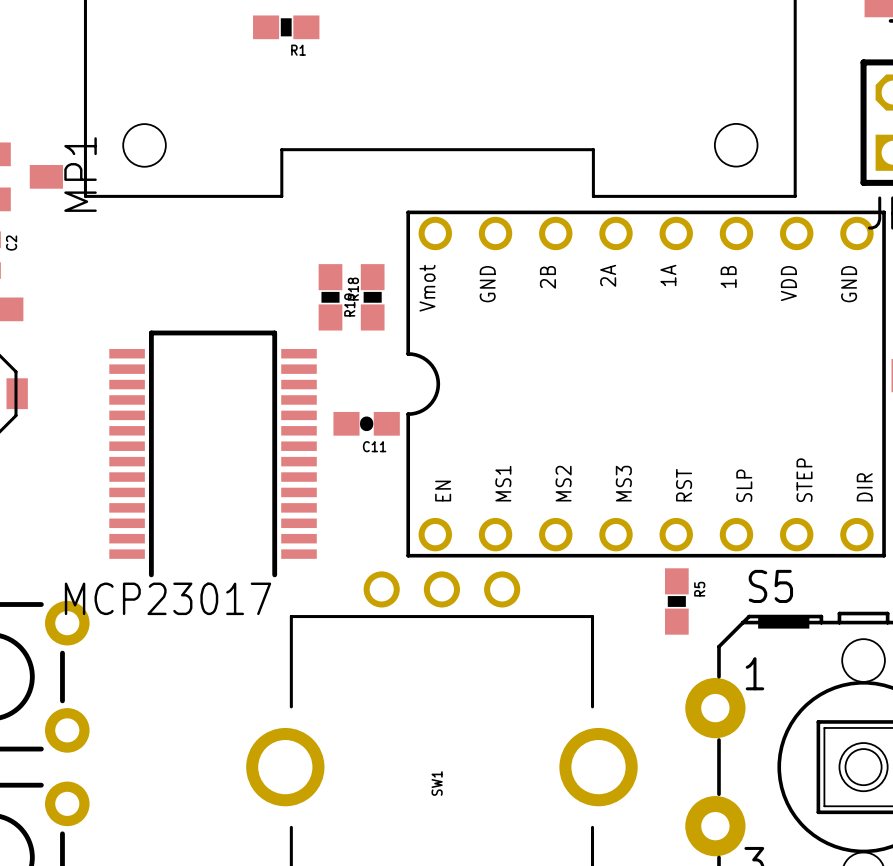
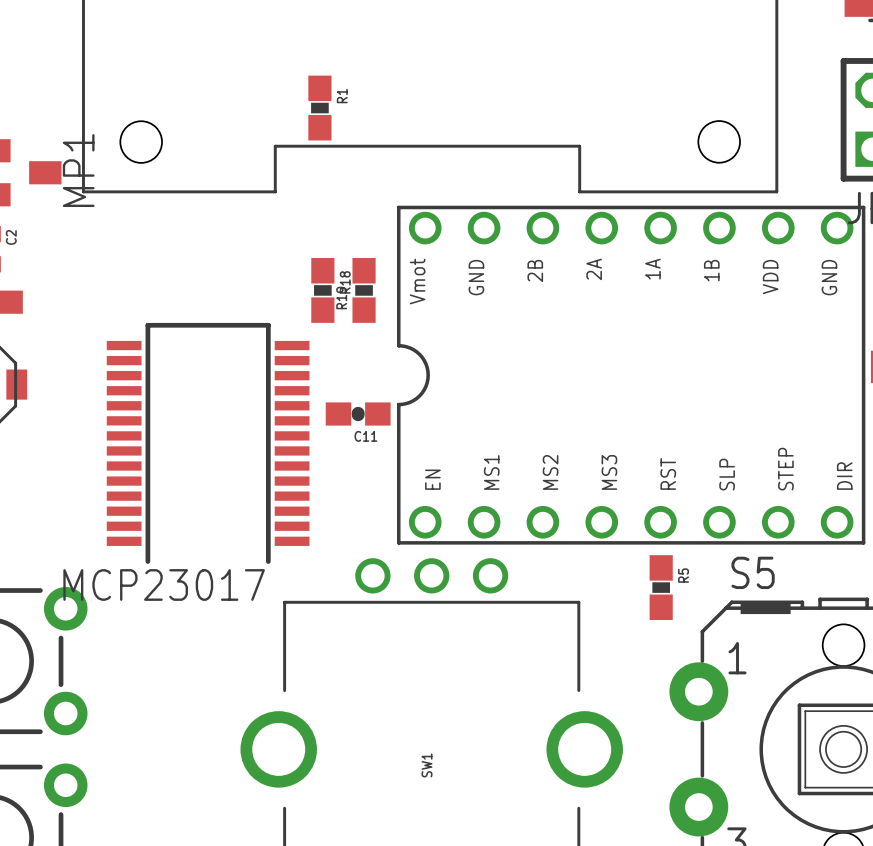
R1 rotation: 0° (286, 27) -> 90° clockwise (319, 108)
R1 position: (286, 27) -> (319, 108)

